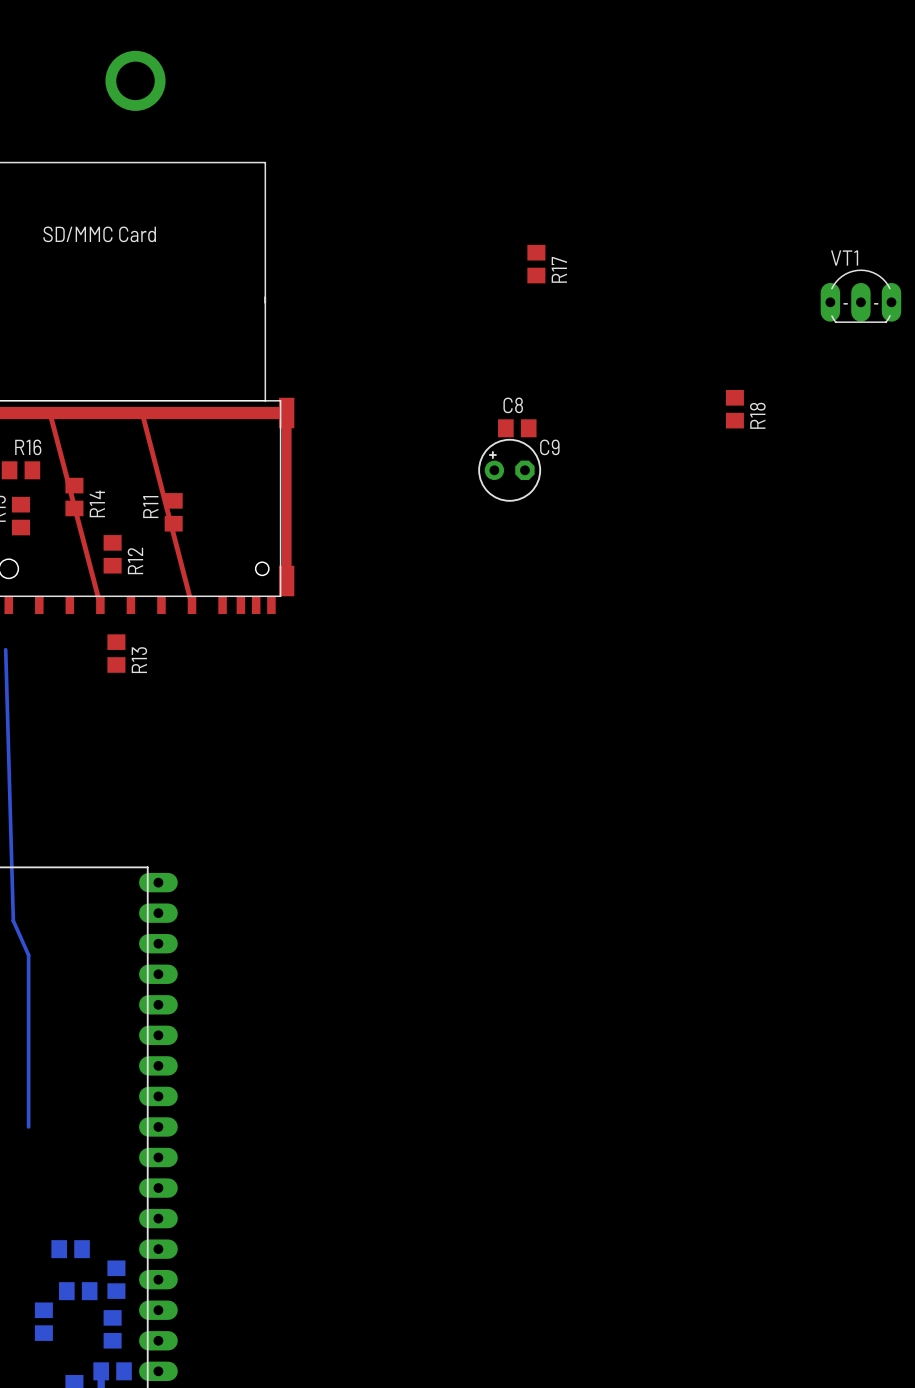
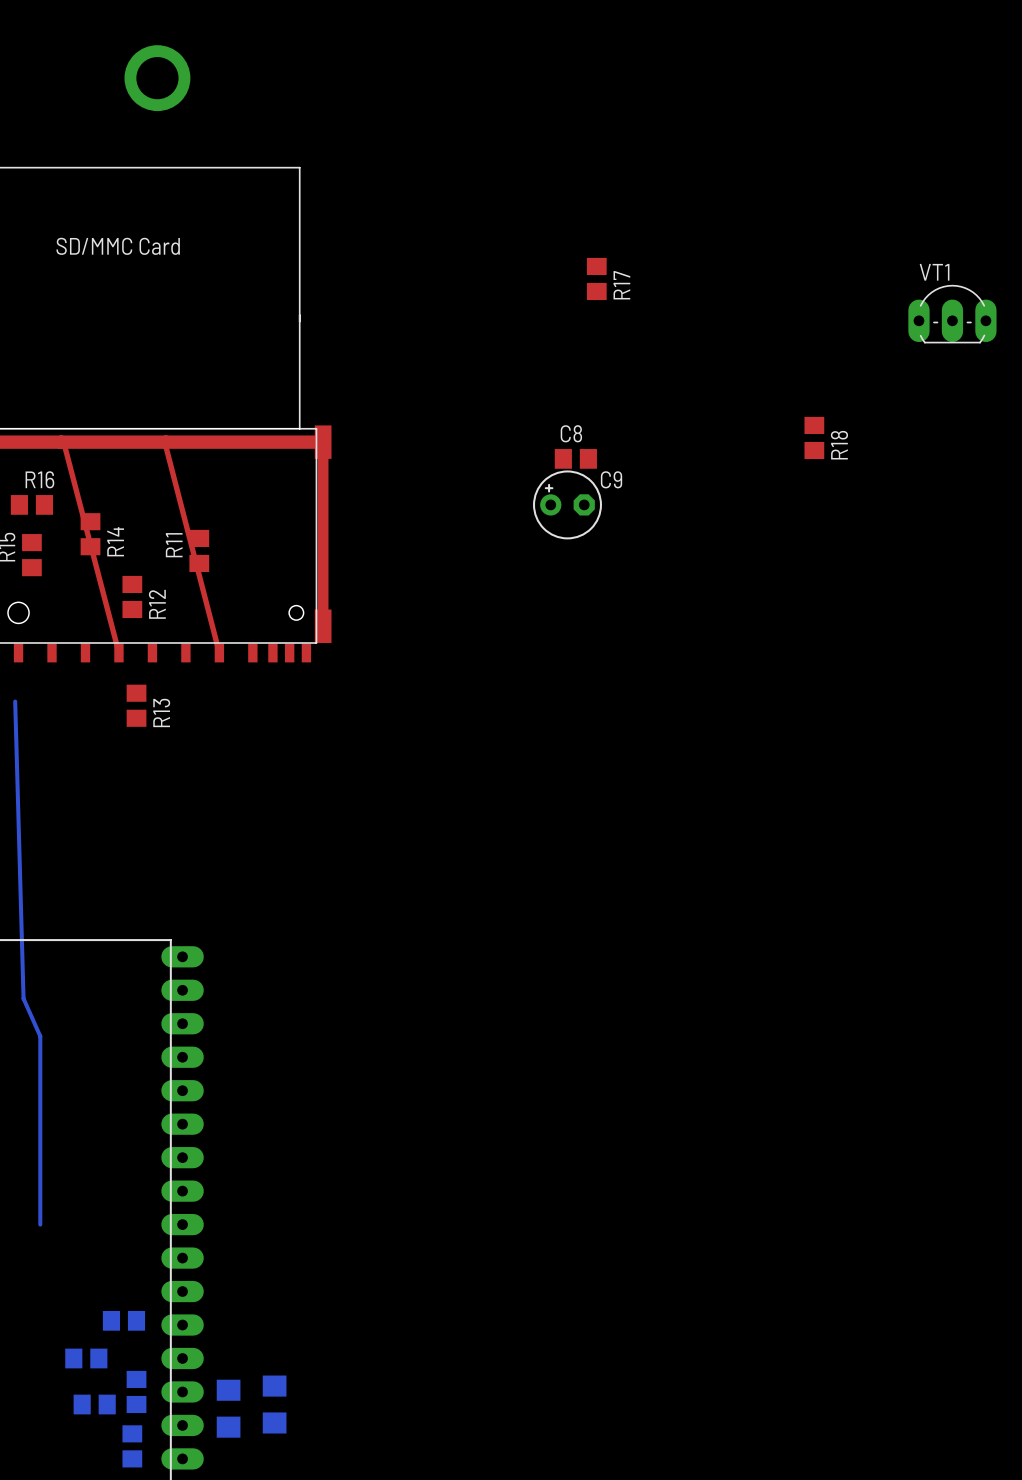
part: none -> (274, 1404)
part: none -> (228, 1408)
part rotation: 0° (43, 1321) -> 90° clockwise (123, 1320)
part position: (43, 1321) -> (123, 1320)

